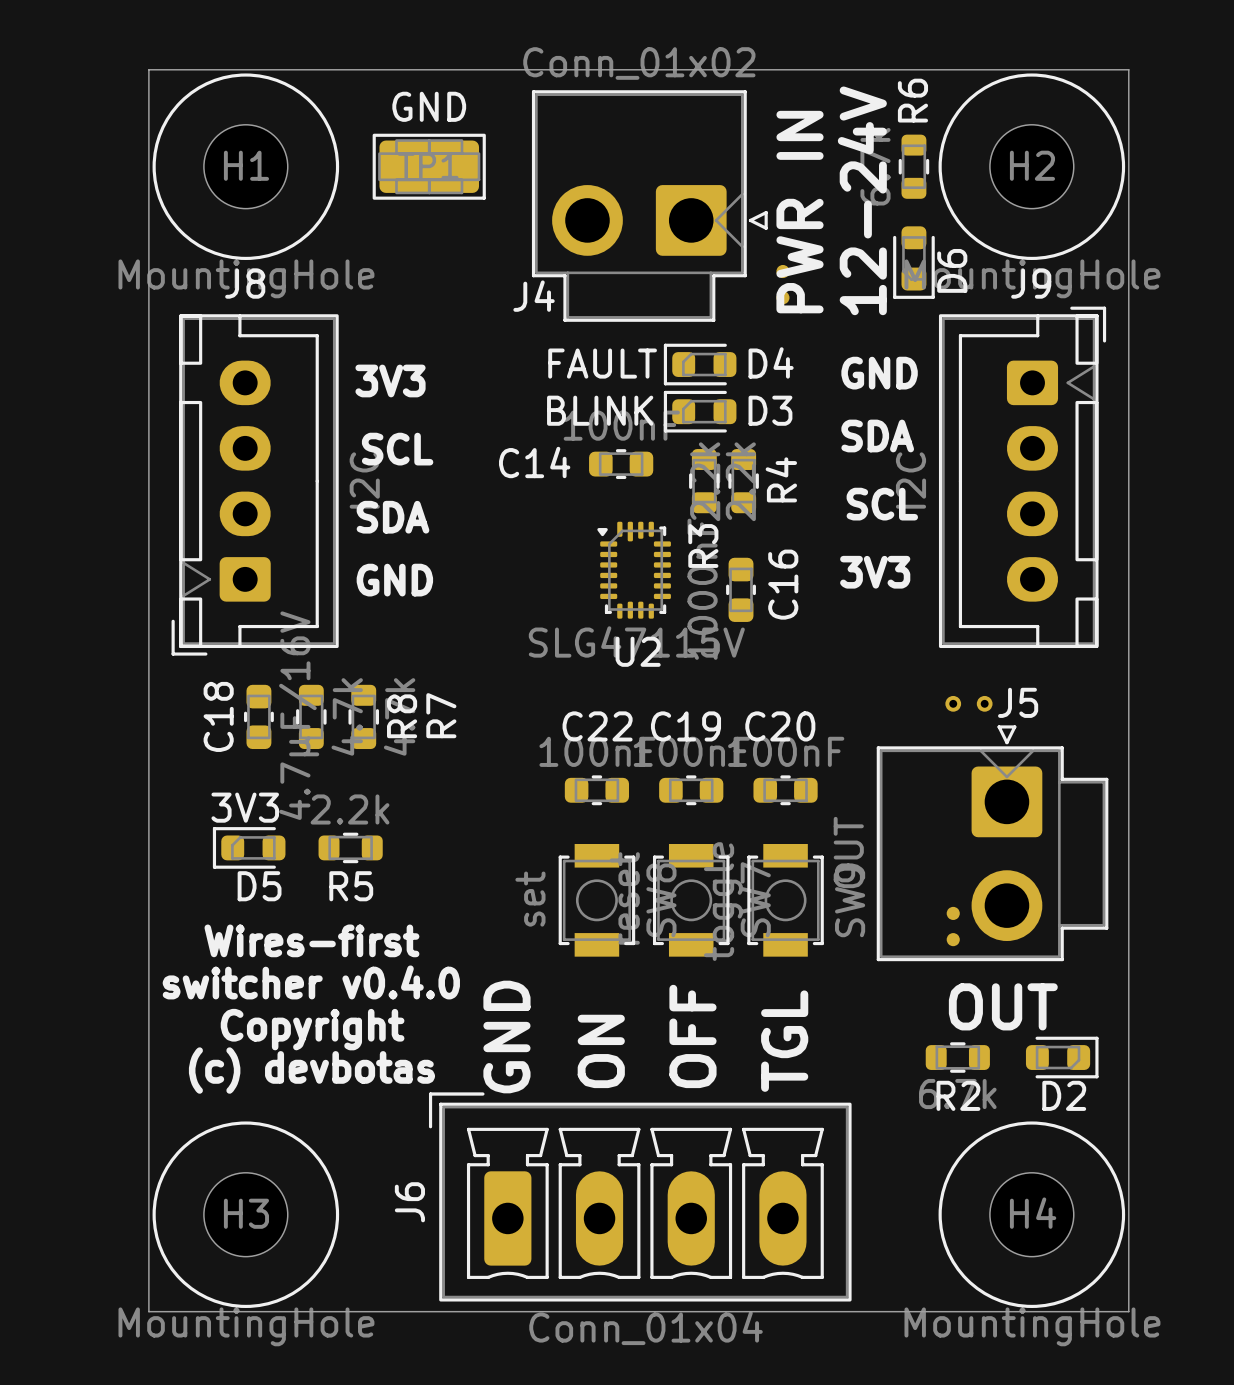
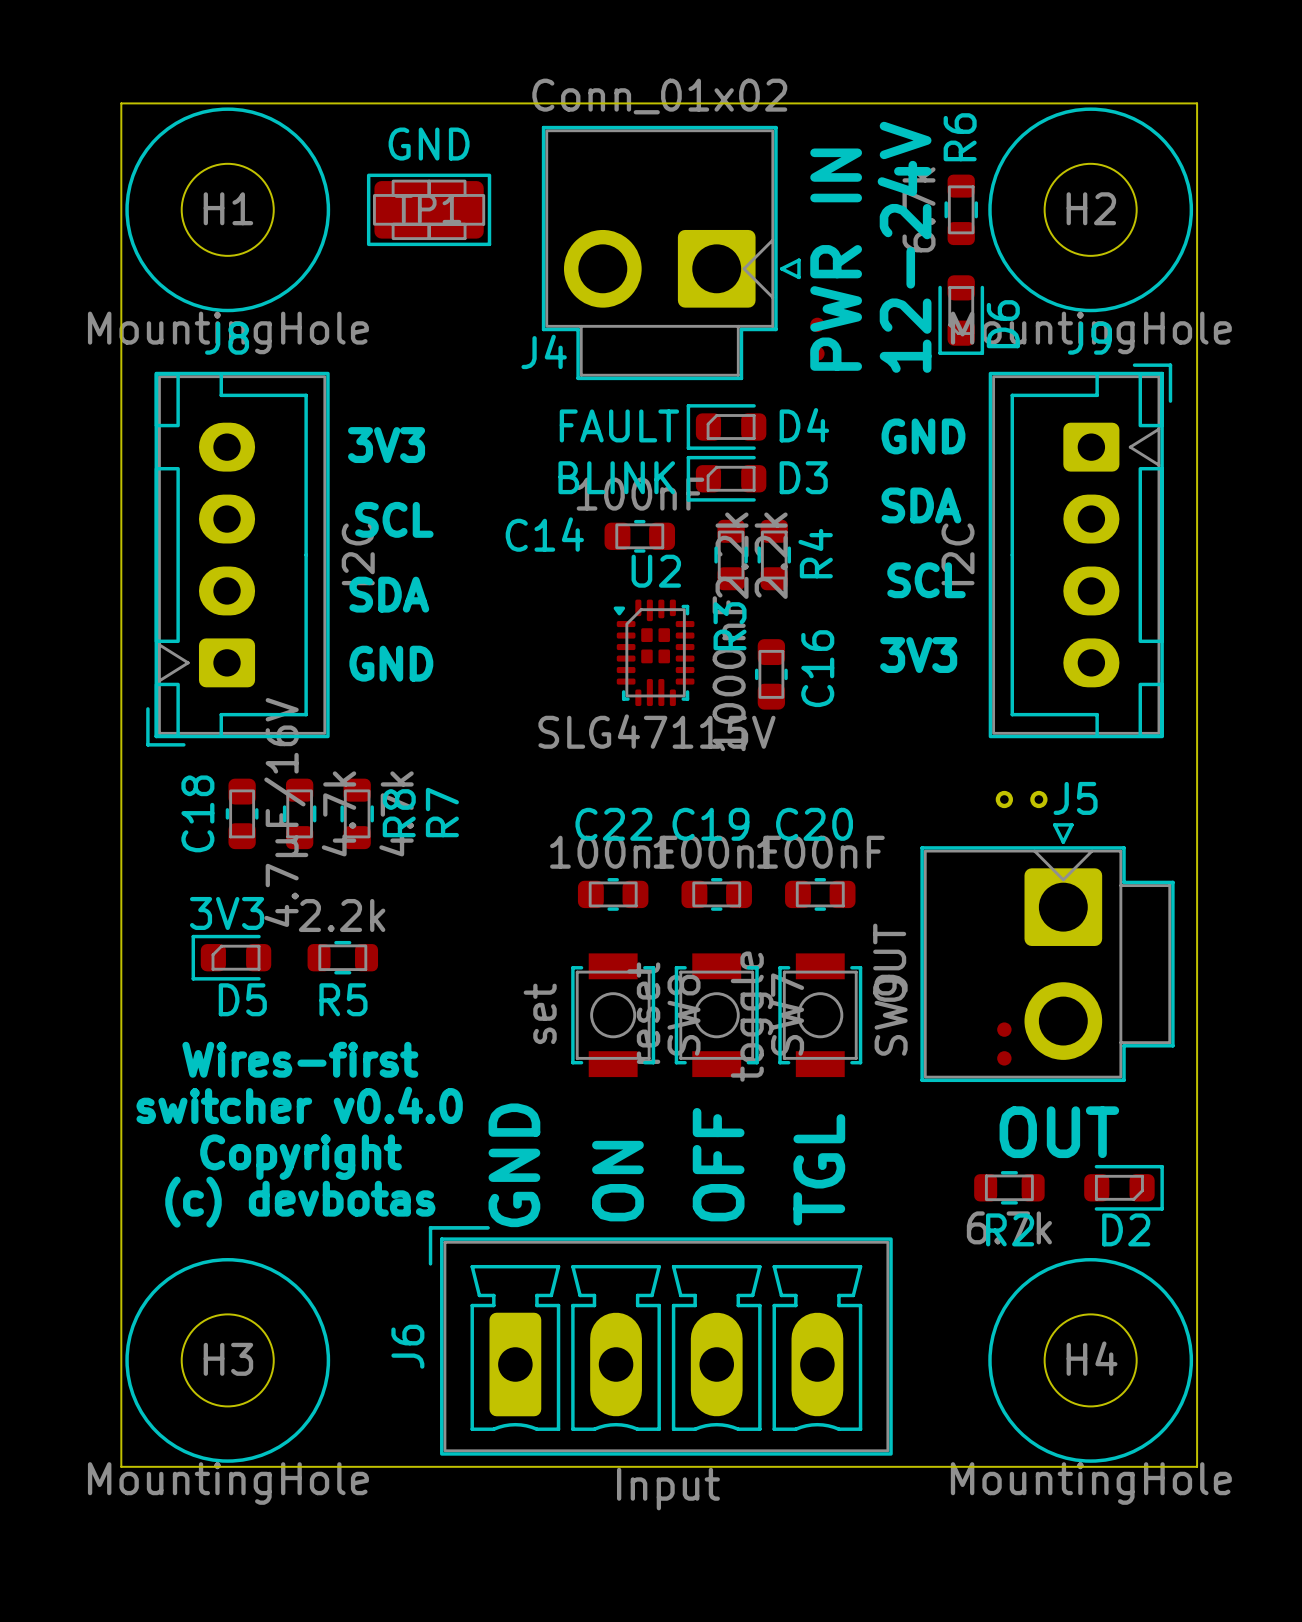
U2 footprint: [597, 521, 671, 619] -> [613, 599, 695, 707]
U2 name position: U2 (638, 651) -> U2 (656, 571)
J6 value: Conn_01x04 (646, 1328) -> Input (668, 1489)

